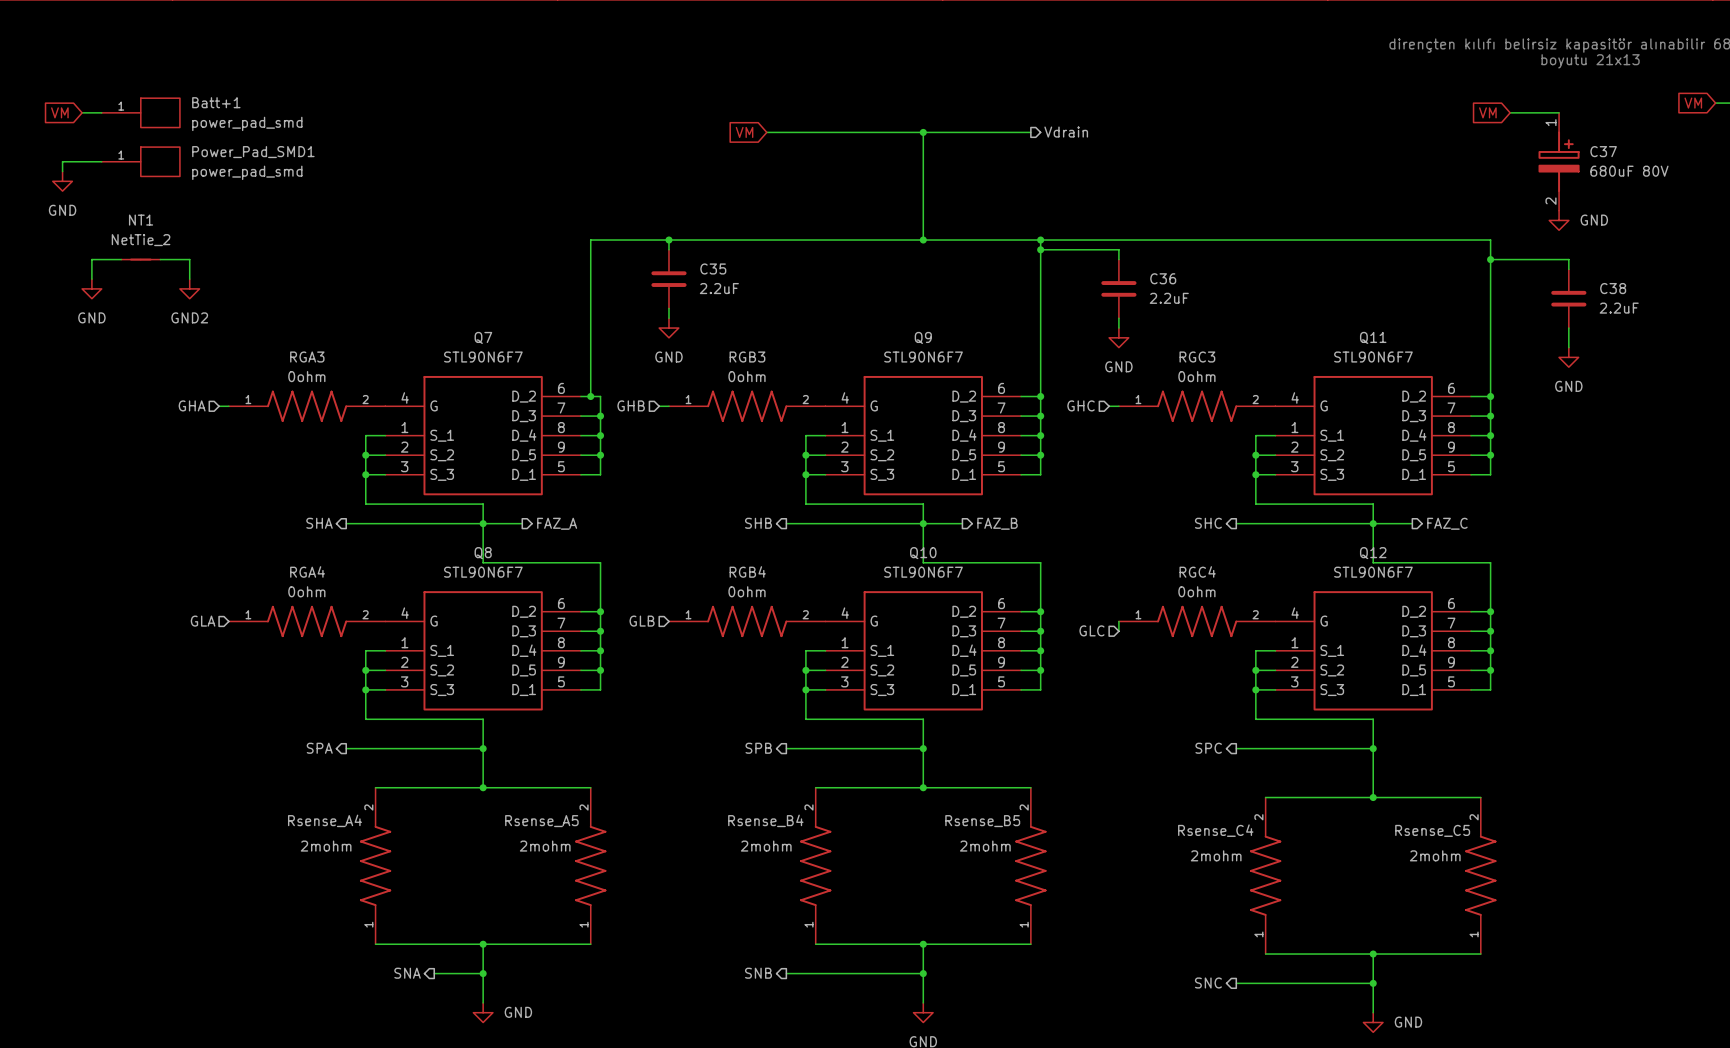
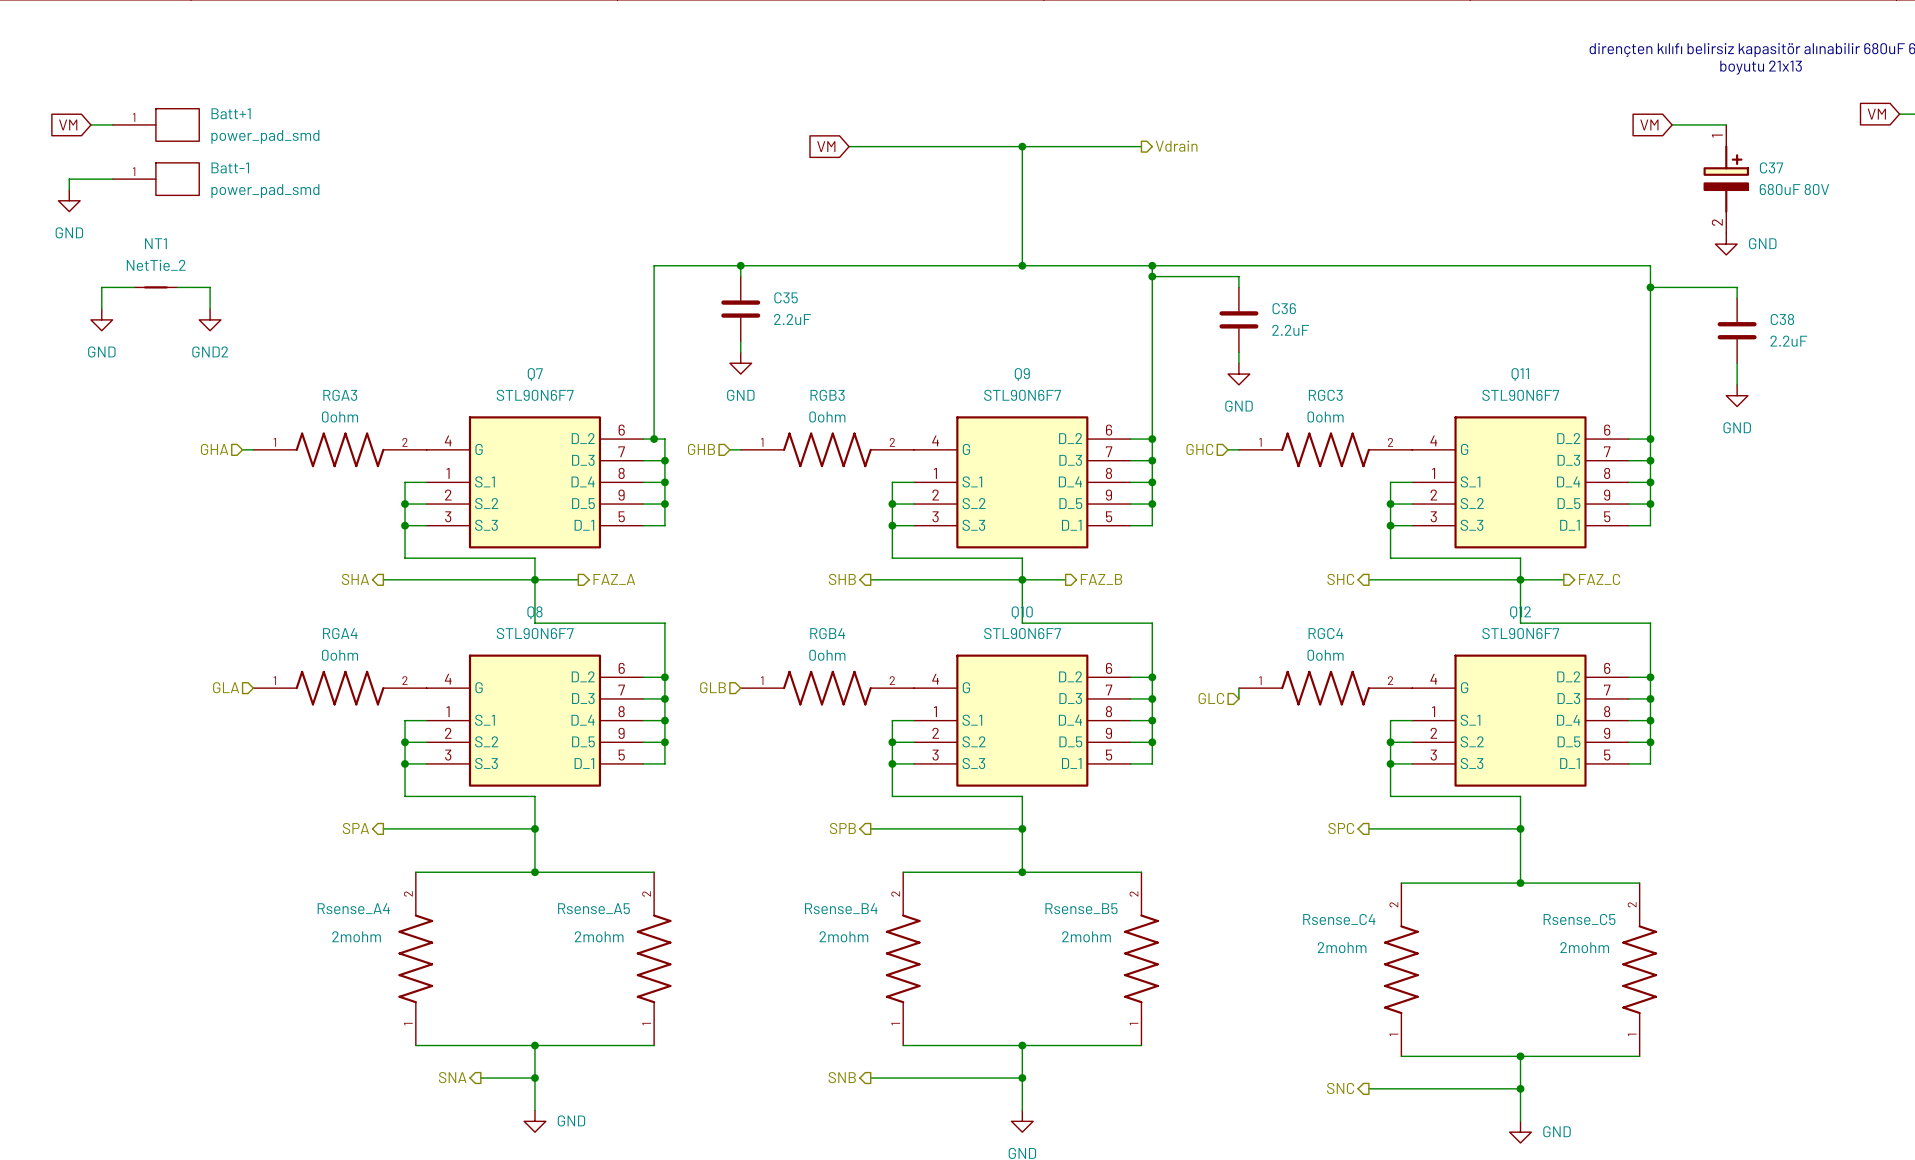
Power_Pad_SMD1 name: Power_Pad_SMD1 (253, 152) -> Batt-1 (230, 167)

